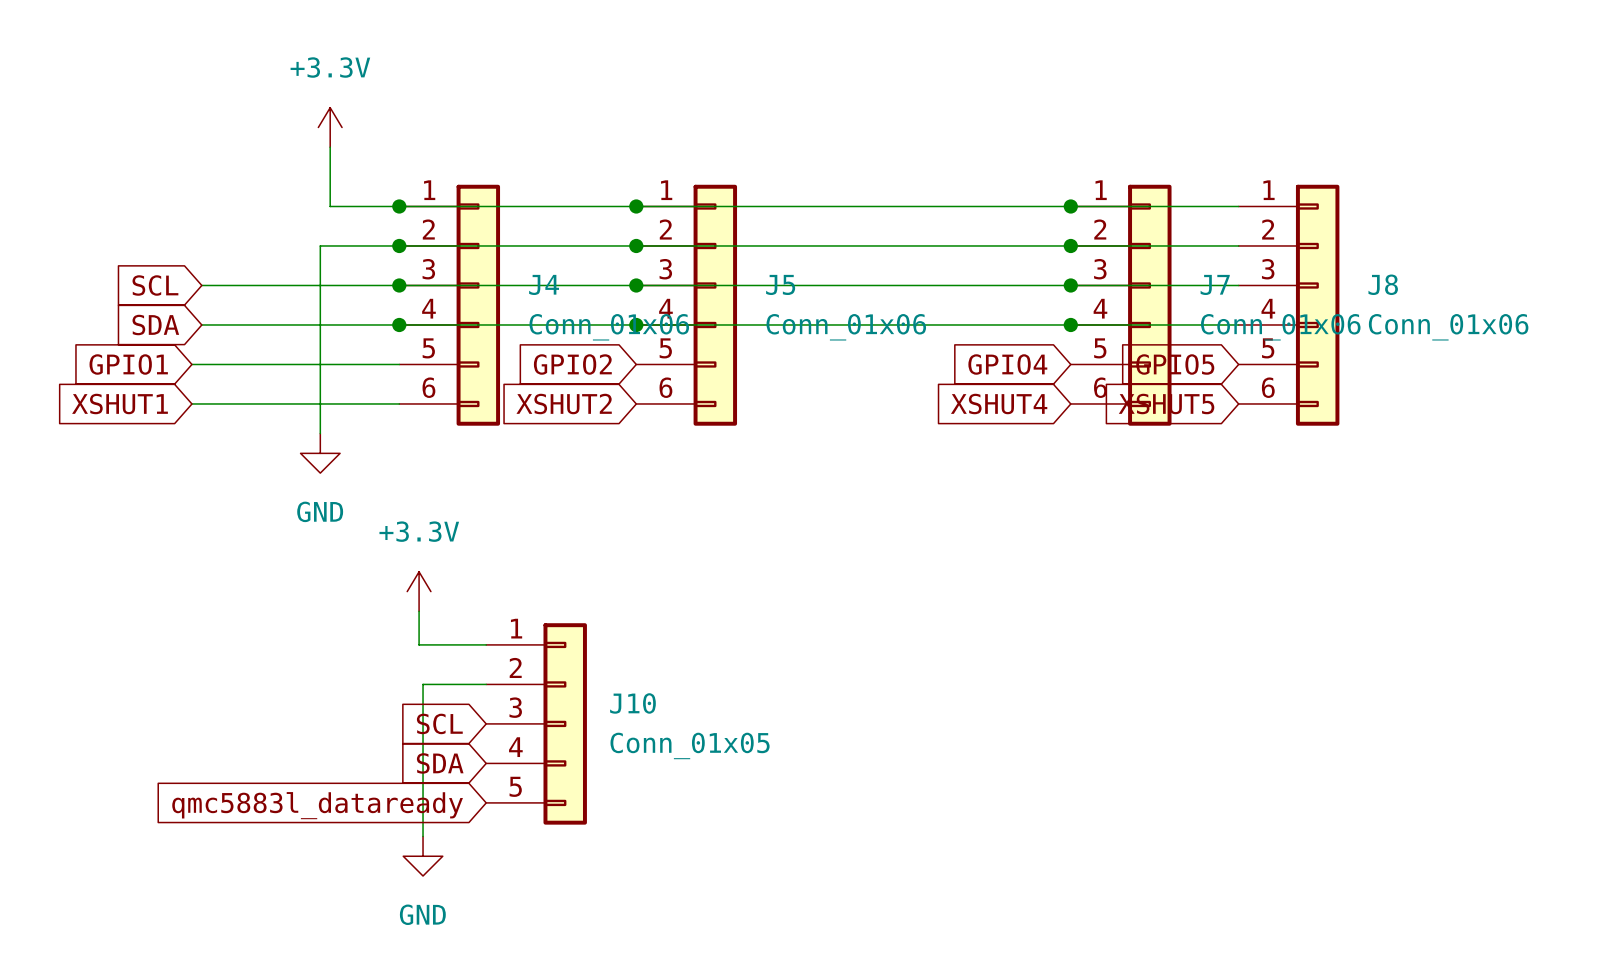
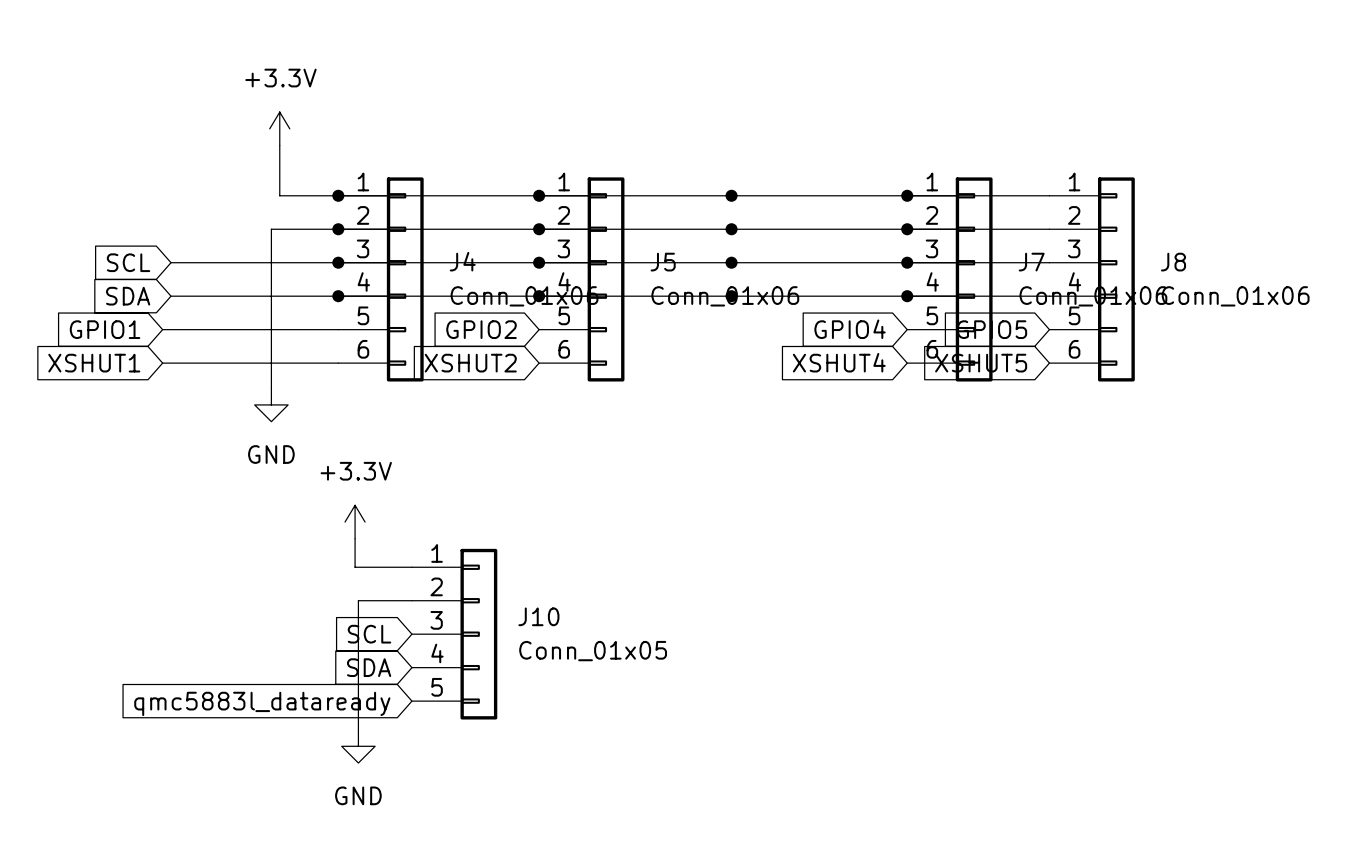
junction: none -> (731, 195)
junction: none -> (731, 229)
junction: none -> (731, 262)
junction: none -> (731, 296)

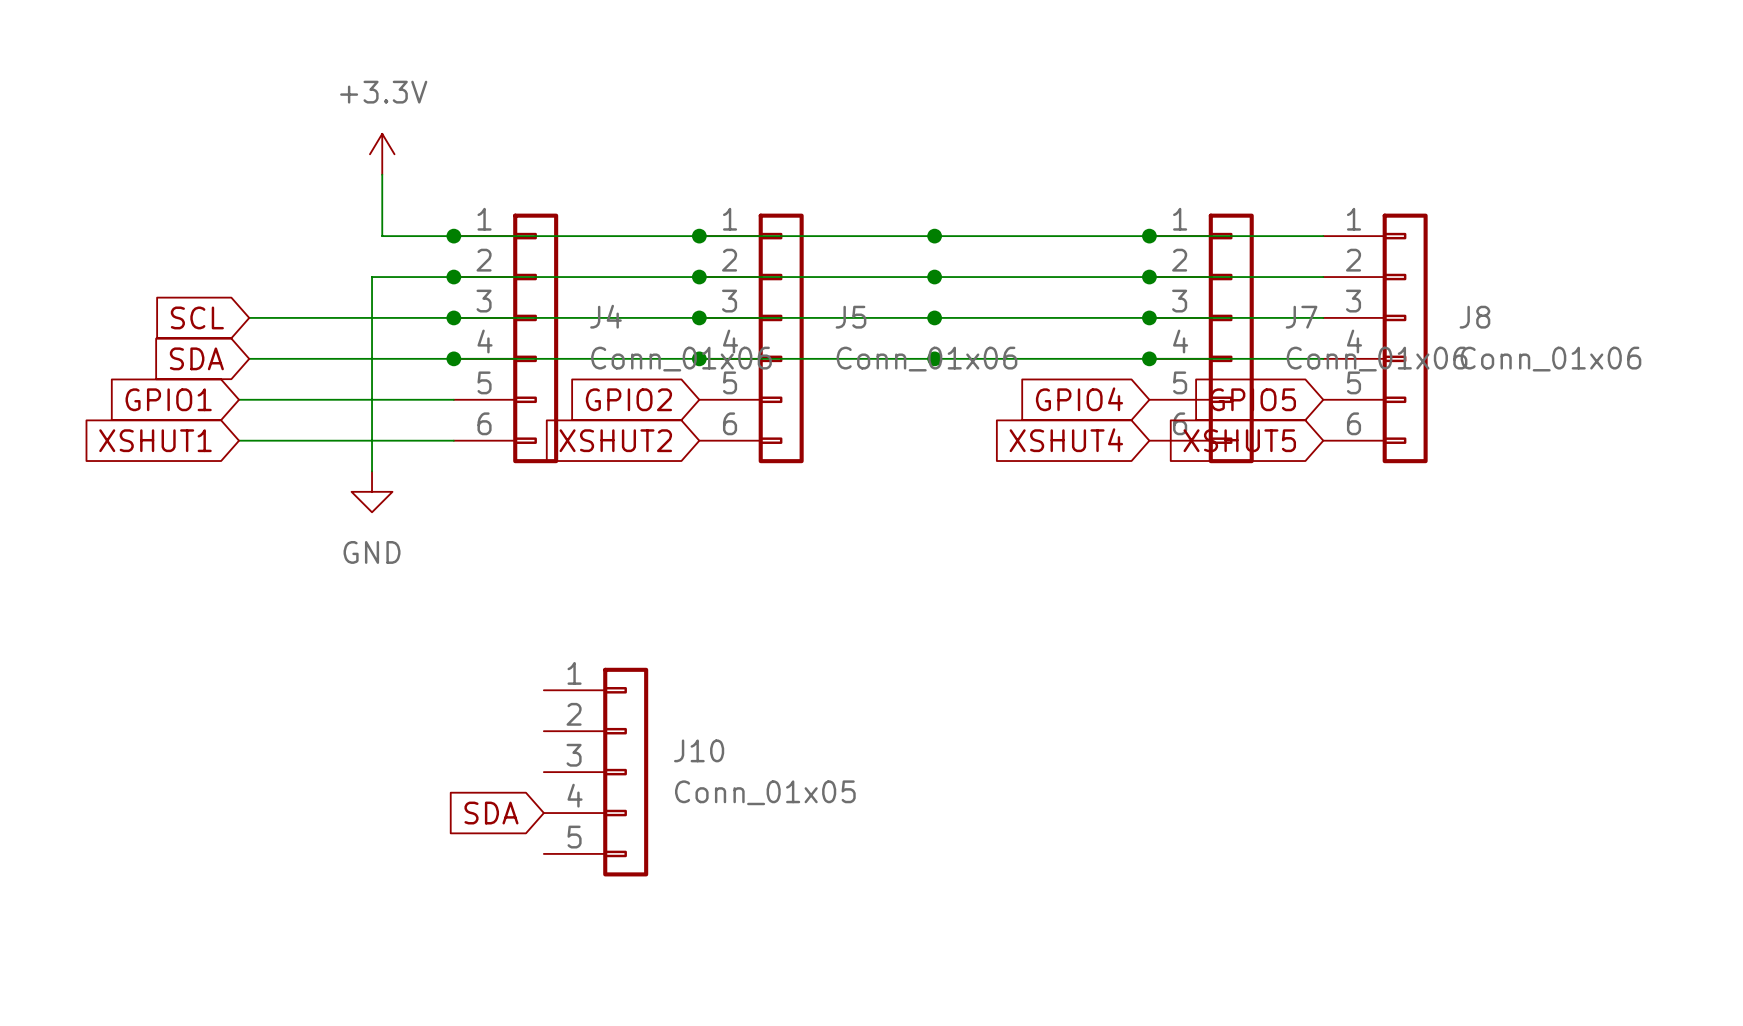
power symbol: +3.3V (355, 522) -> none
wire: (355, 538) (355, 567) (411, 567) -> none
wire: (411, 600) (358, 600) (358, 729) -> none
global label: SCL (369, 634) -> none
global label: qmc5883l_dataready (262, 703) -> none
power symbol: GND (358, 746) -> none

